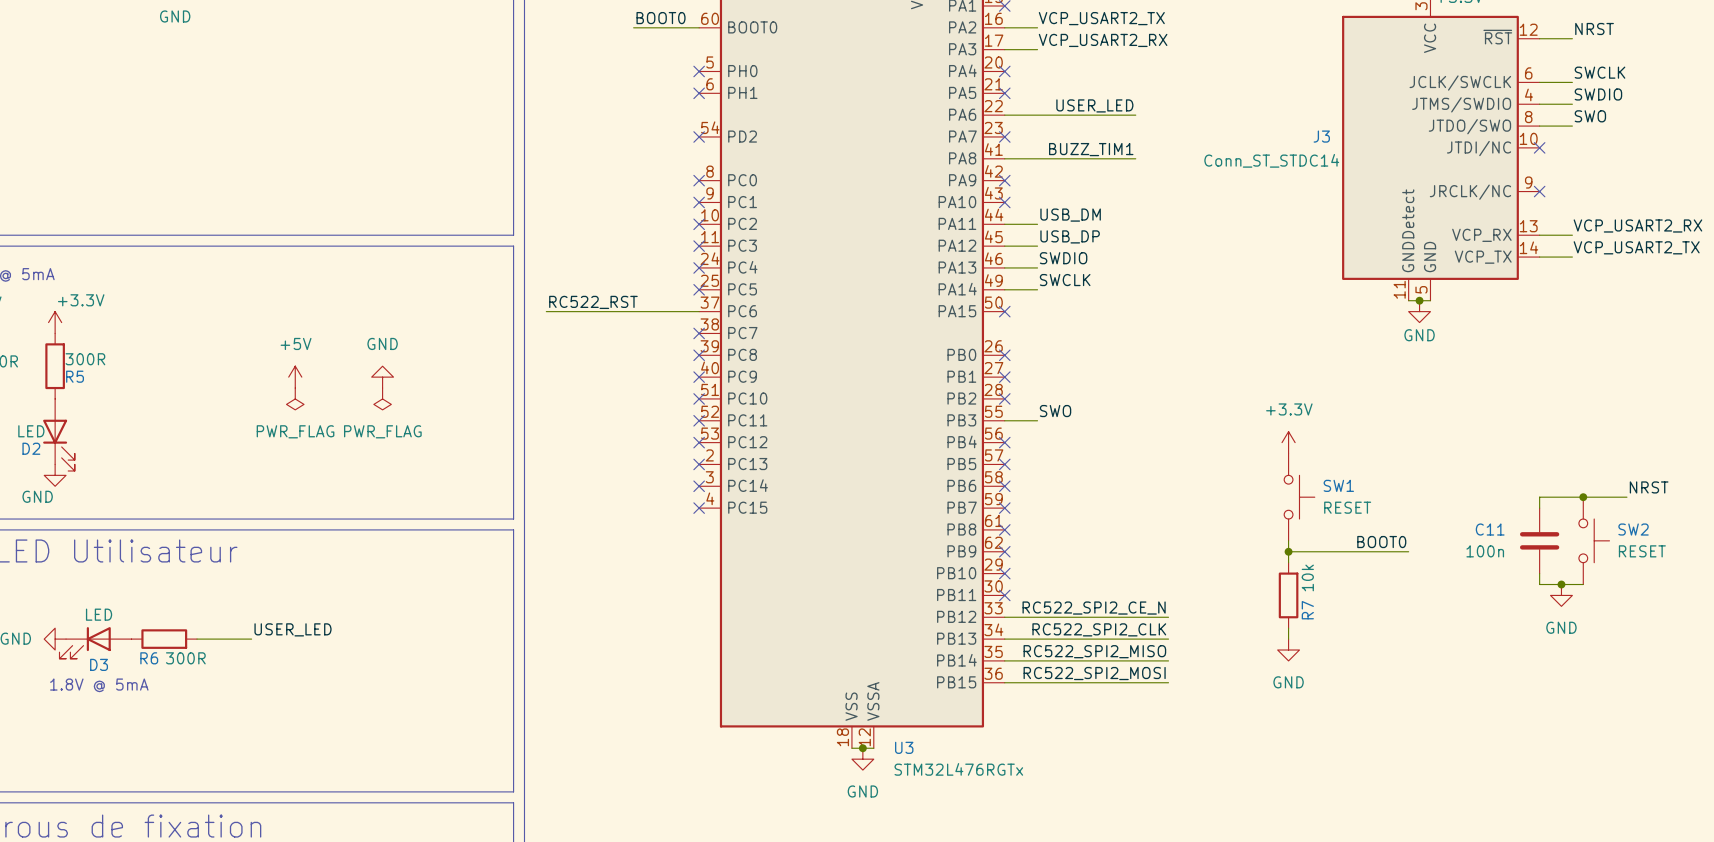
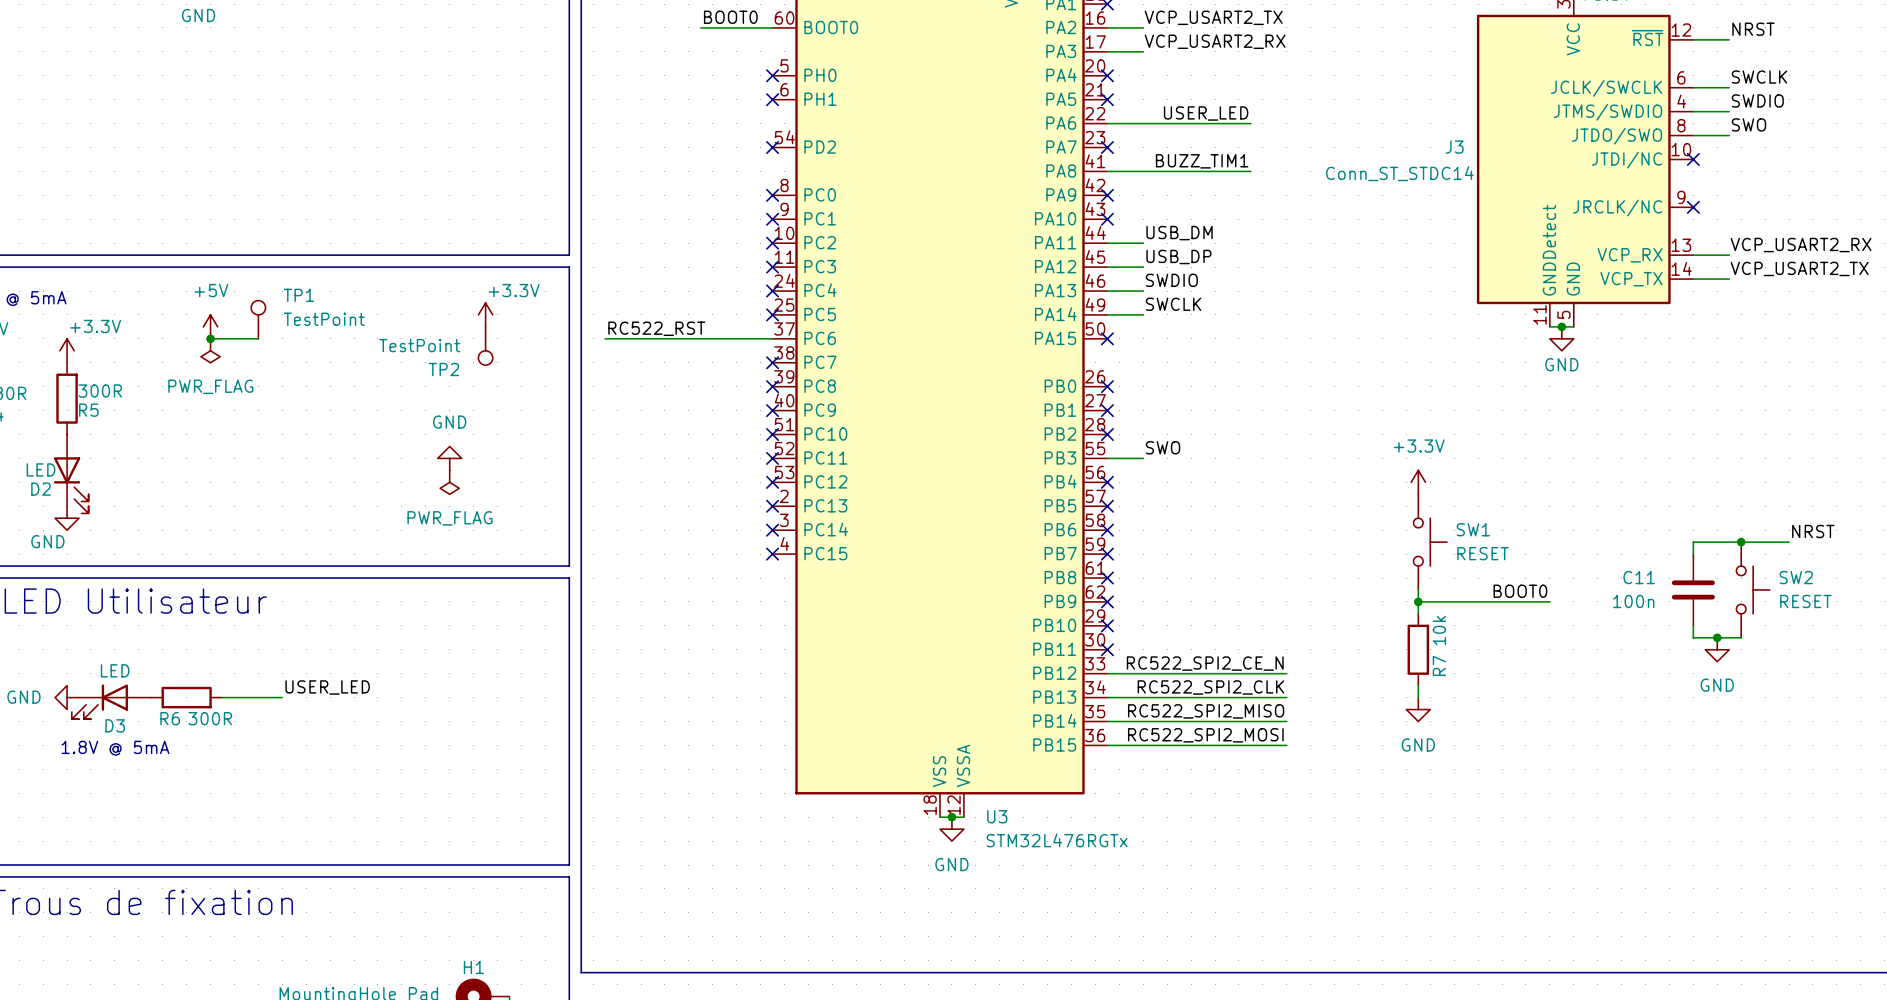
power symbol: none -> +3.3V (485, 314)
TP1: none -> TestPoint (258, 319)
wire: none -> (210, 338) (258, 338)
junction: none -> (210, 338)
TP2: none -> TestPoint (485, 346)
power symbol: none -> PWR_FLAG (210, 350)
power symbol position: +5V (295, 377) -> +5V (210, 326)
power symbol position: GND (382, 377) -> GND (449, 458)
power symbol: PWR_FLAG (295, 398) -> none
power symbol position: PWR_FLAG (382, 398) -> PWR_FLAG (449, 482)

